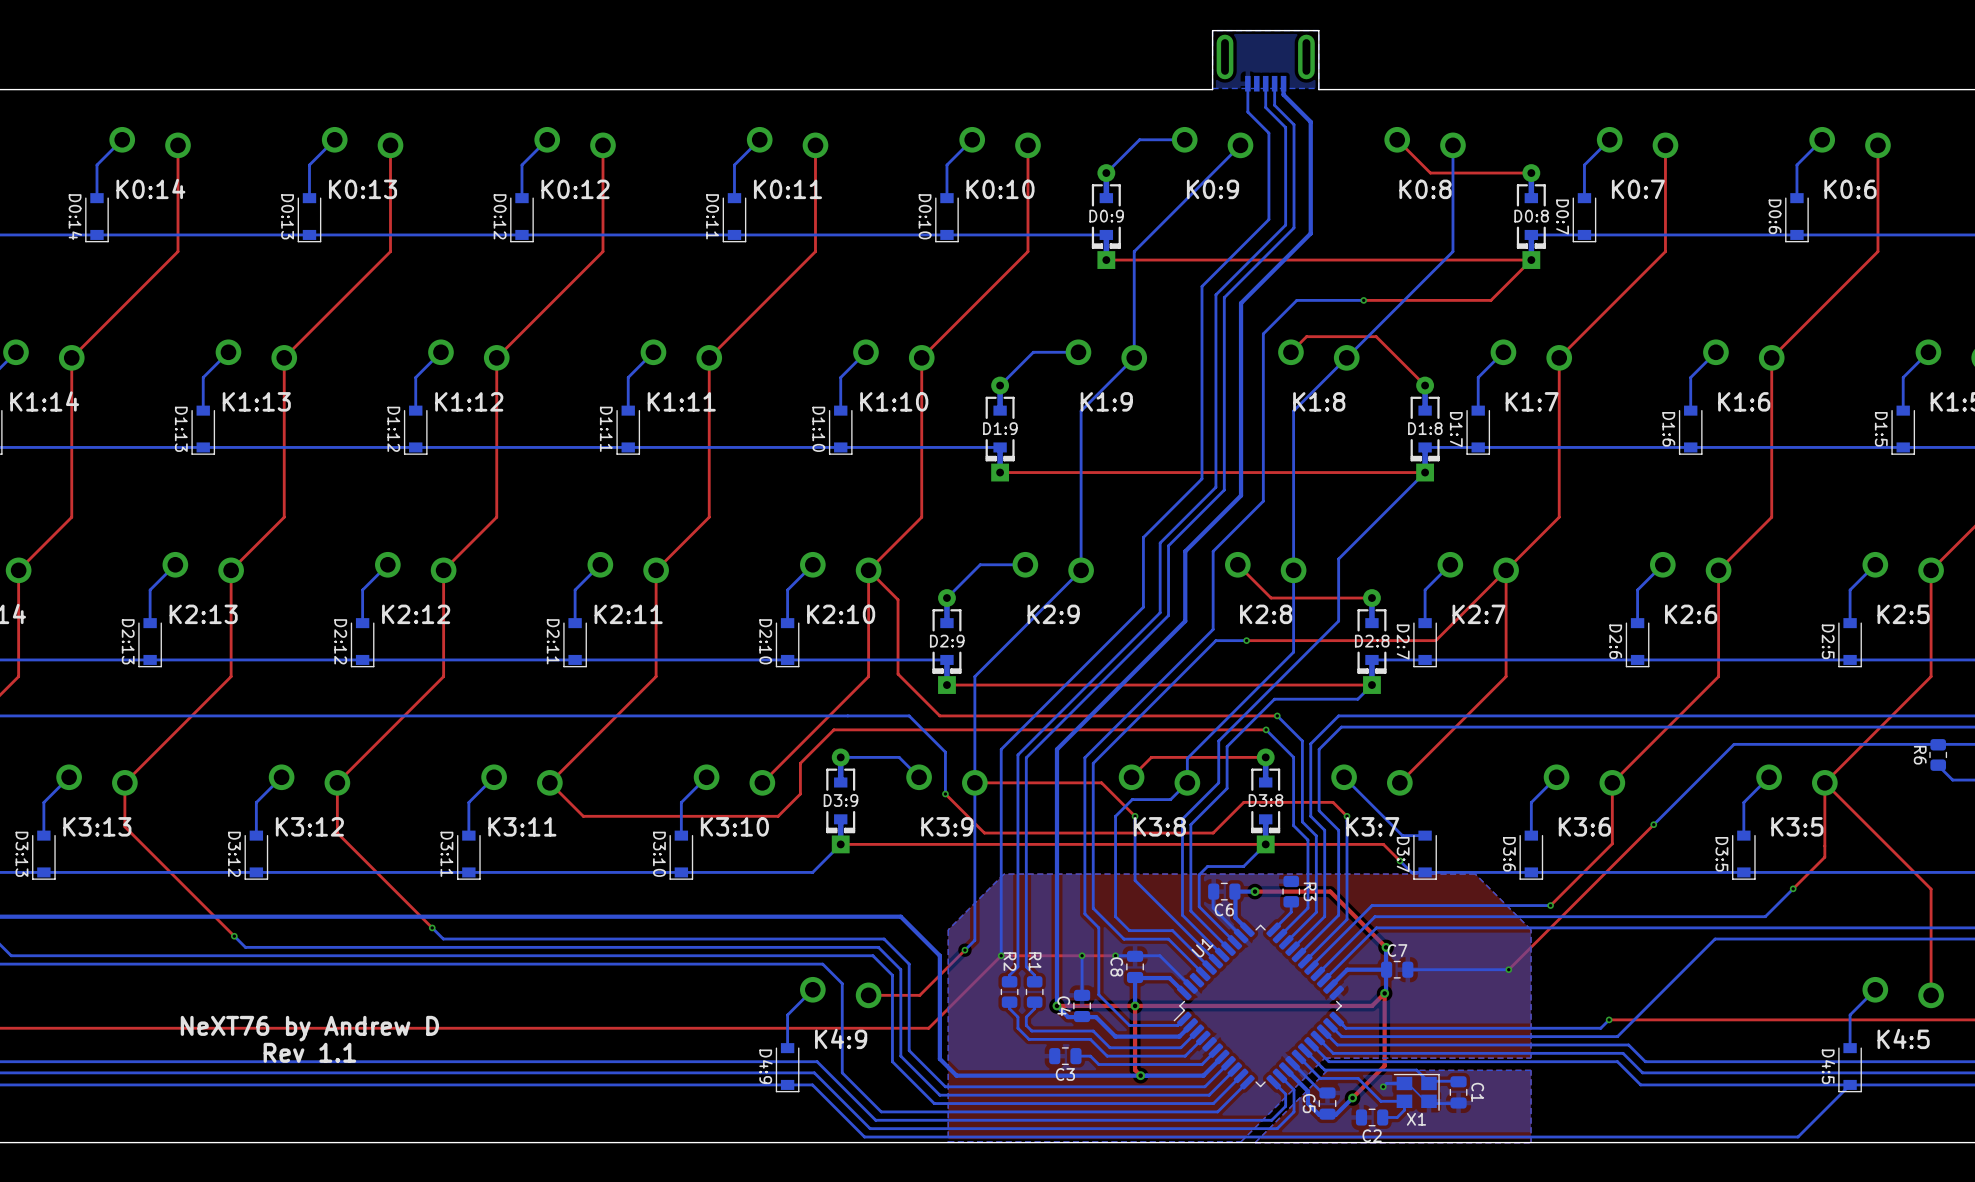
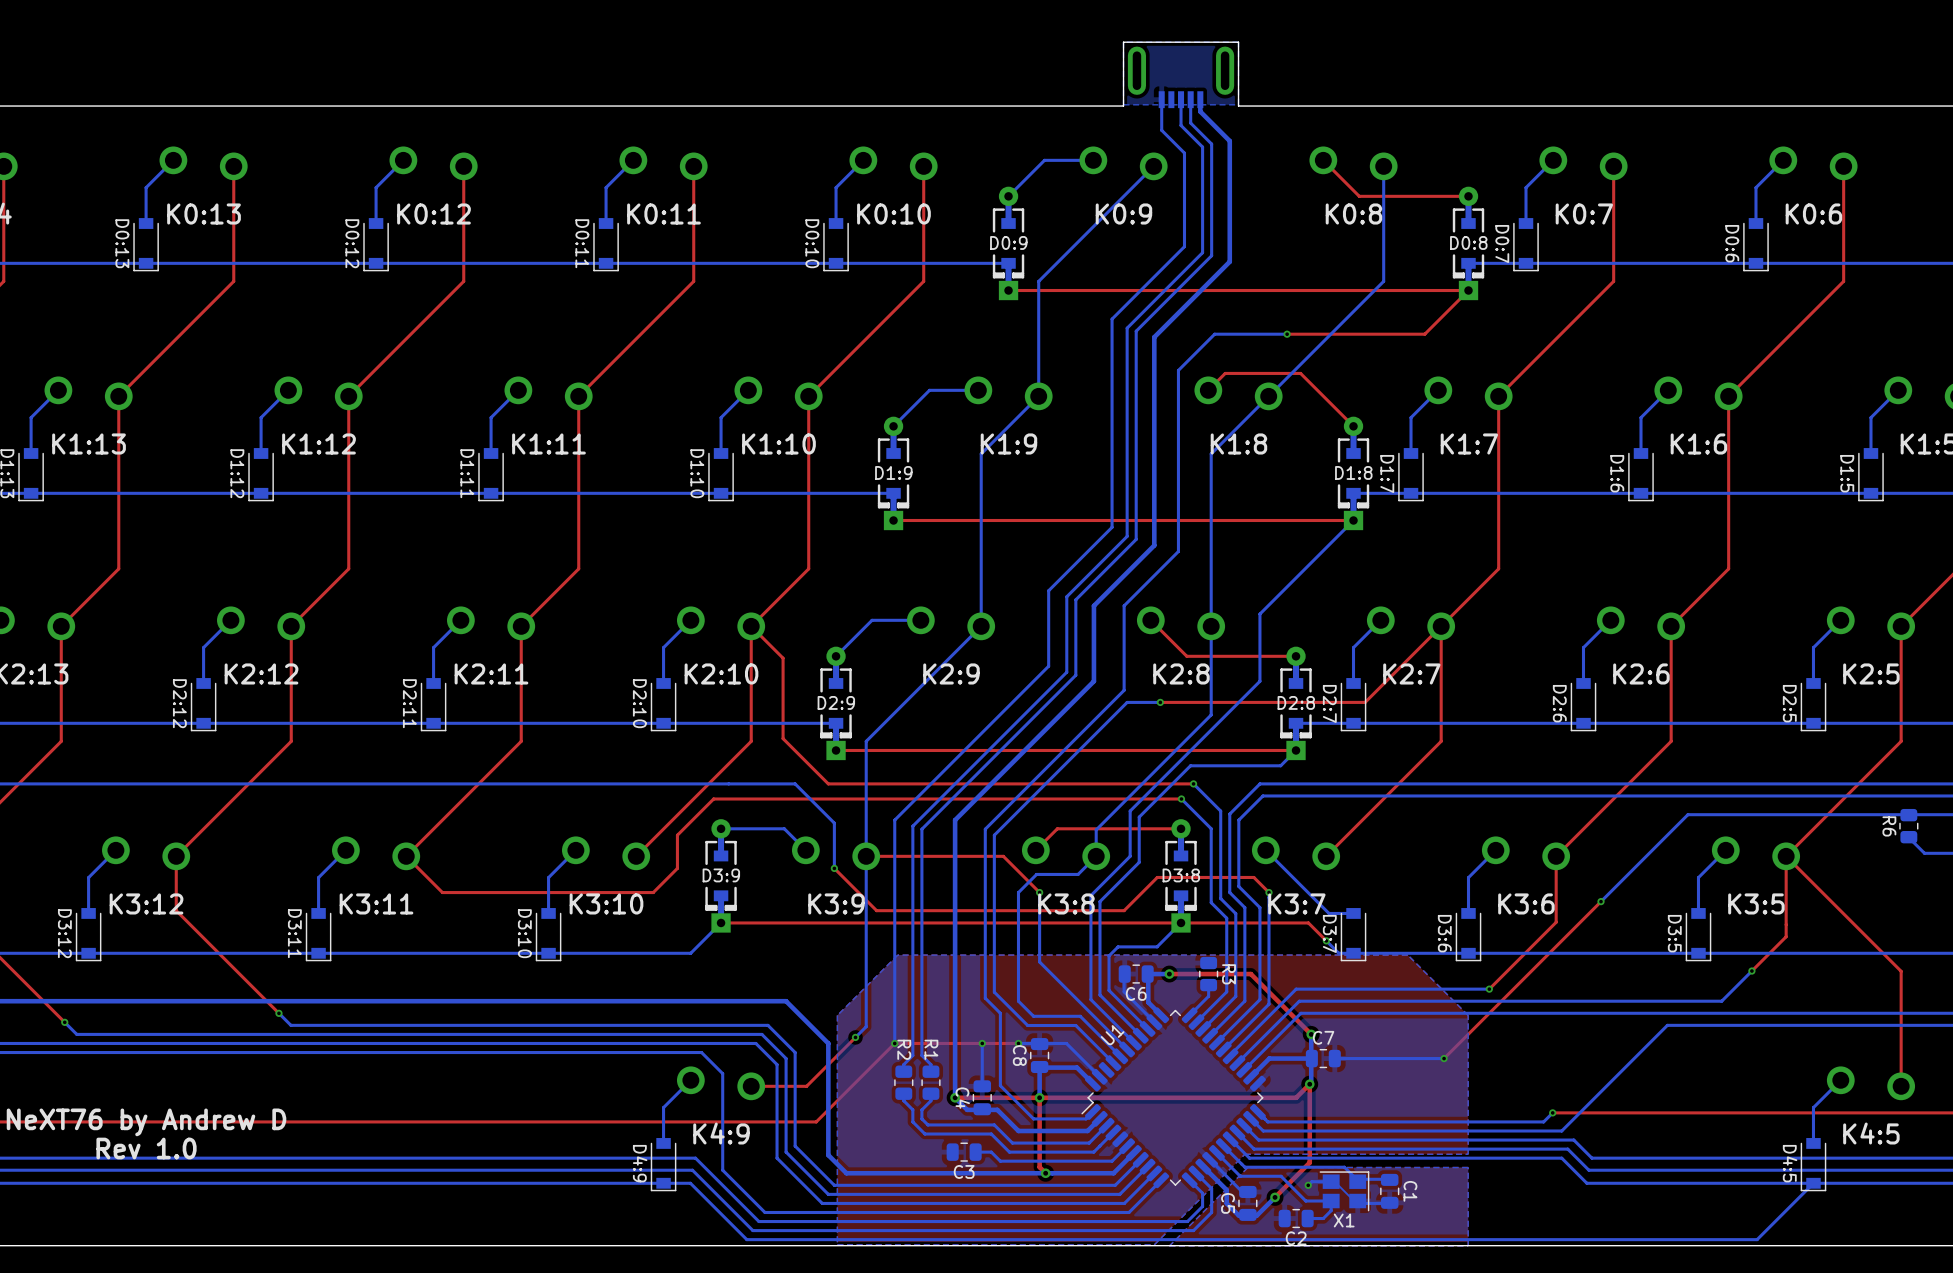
text: Rev 1.1 (309, 1052) -> Rev 1.0 (146, 1148)

